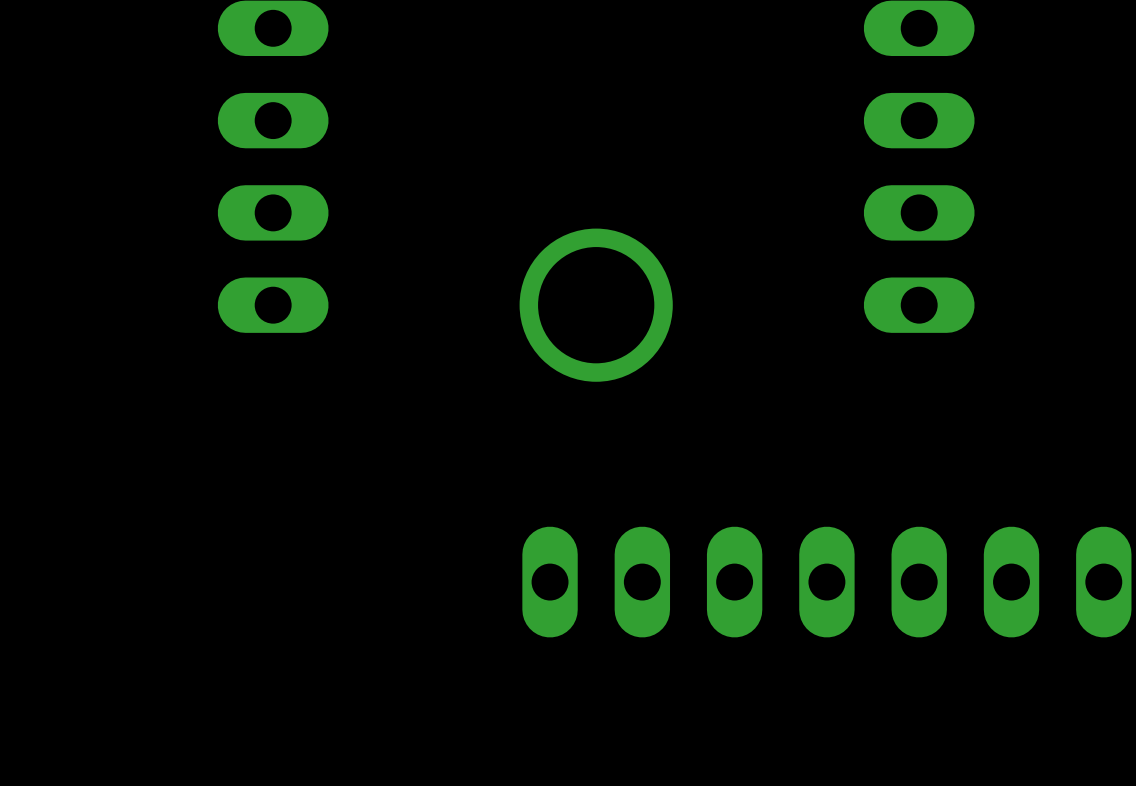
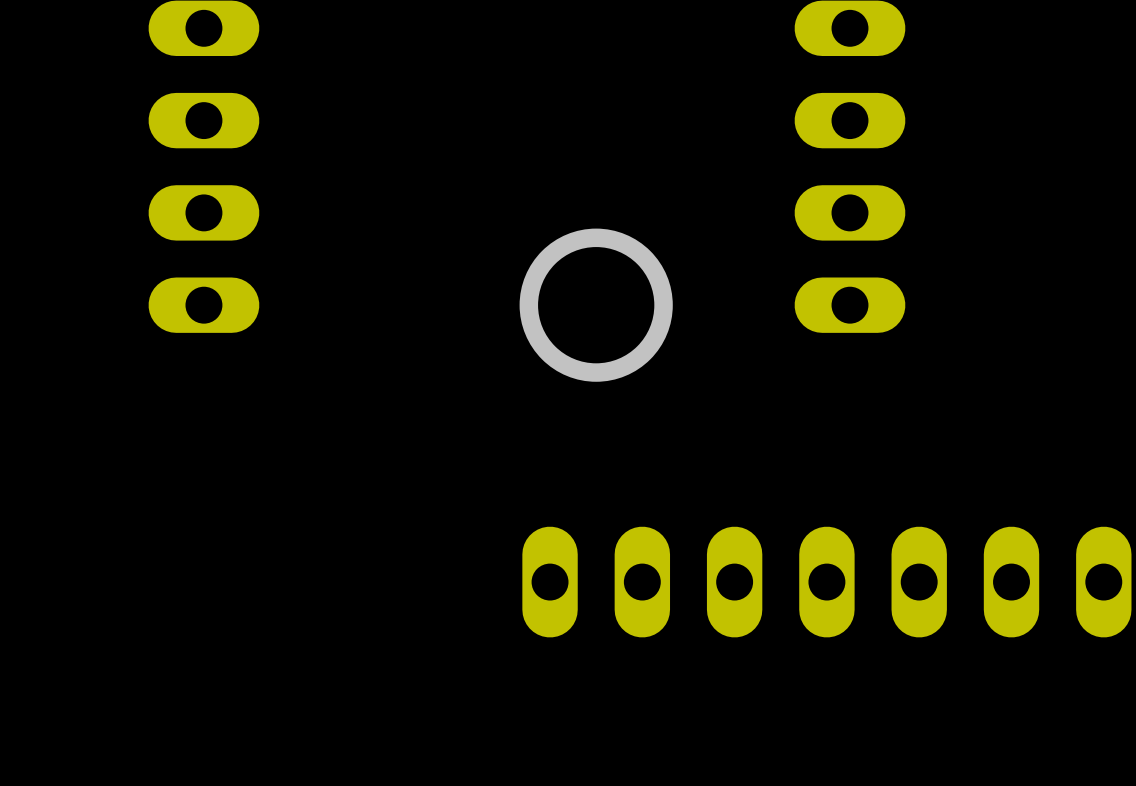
part position: (273, 166) -> (203, 166)
part position: (919, 166) -> (849, 166)

